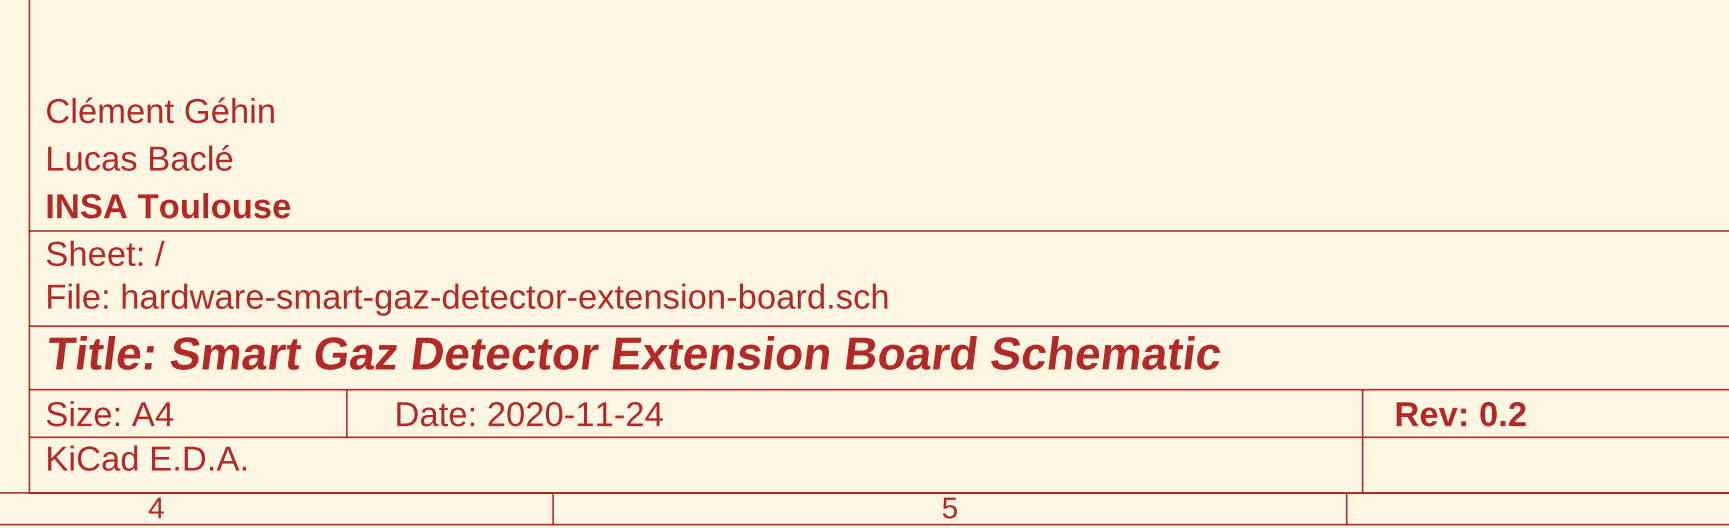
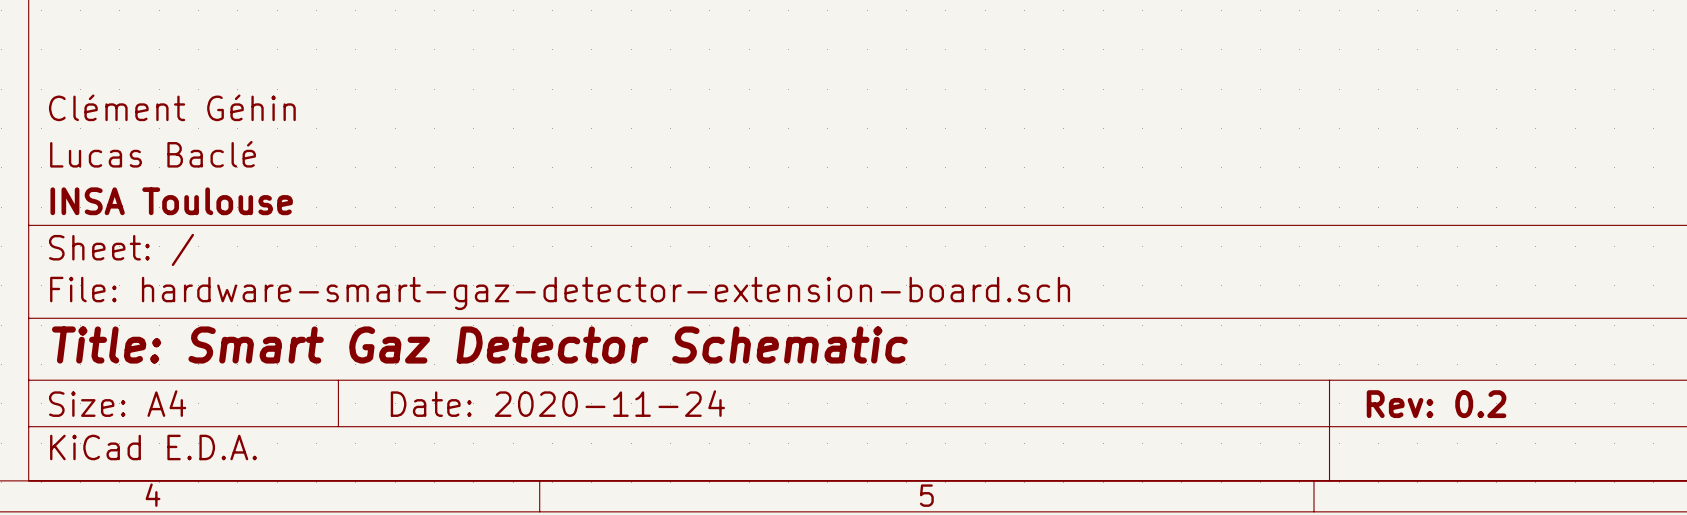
title block: Title: Smart Gaz Detector Extension Board Schematic (634, 352) -> Title: Smart Gaz Detector Schematic (479, 345)

